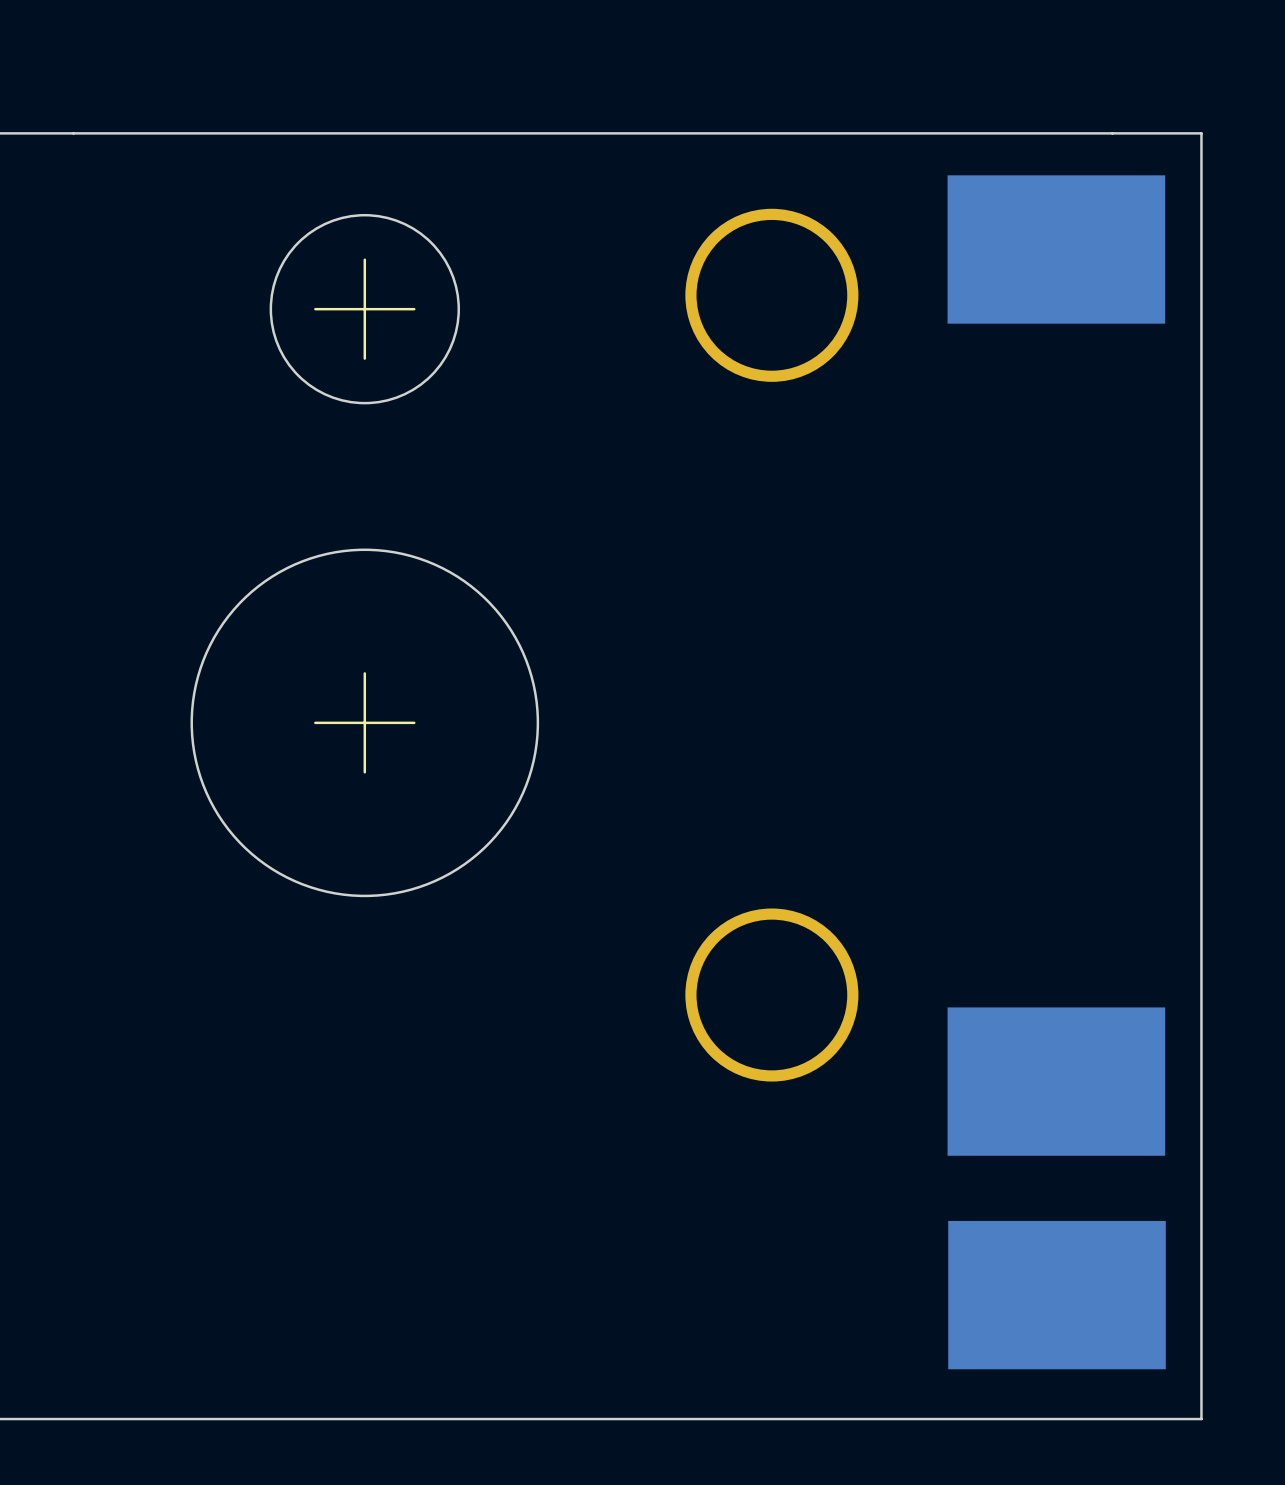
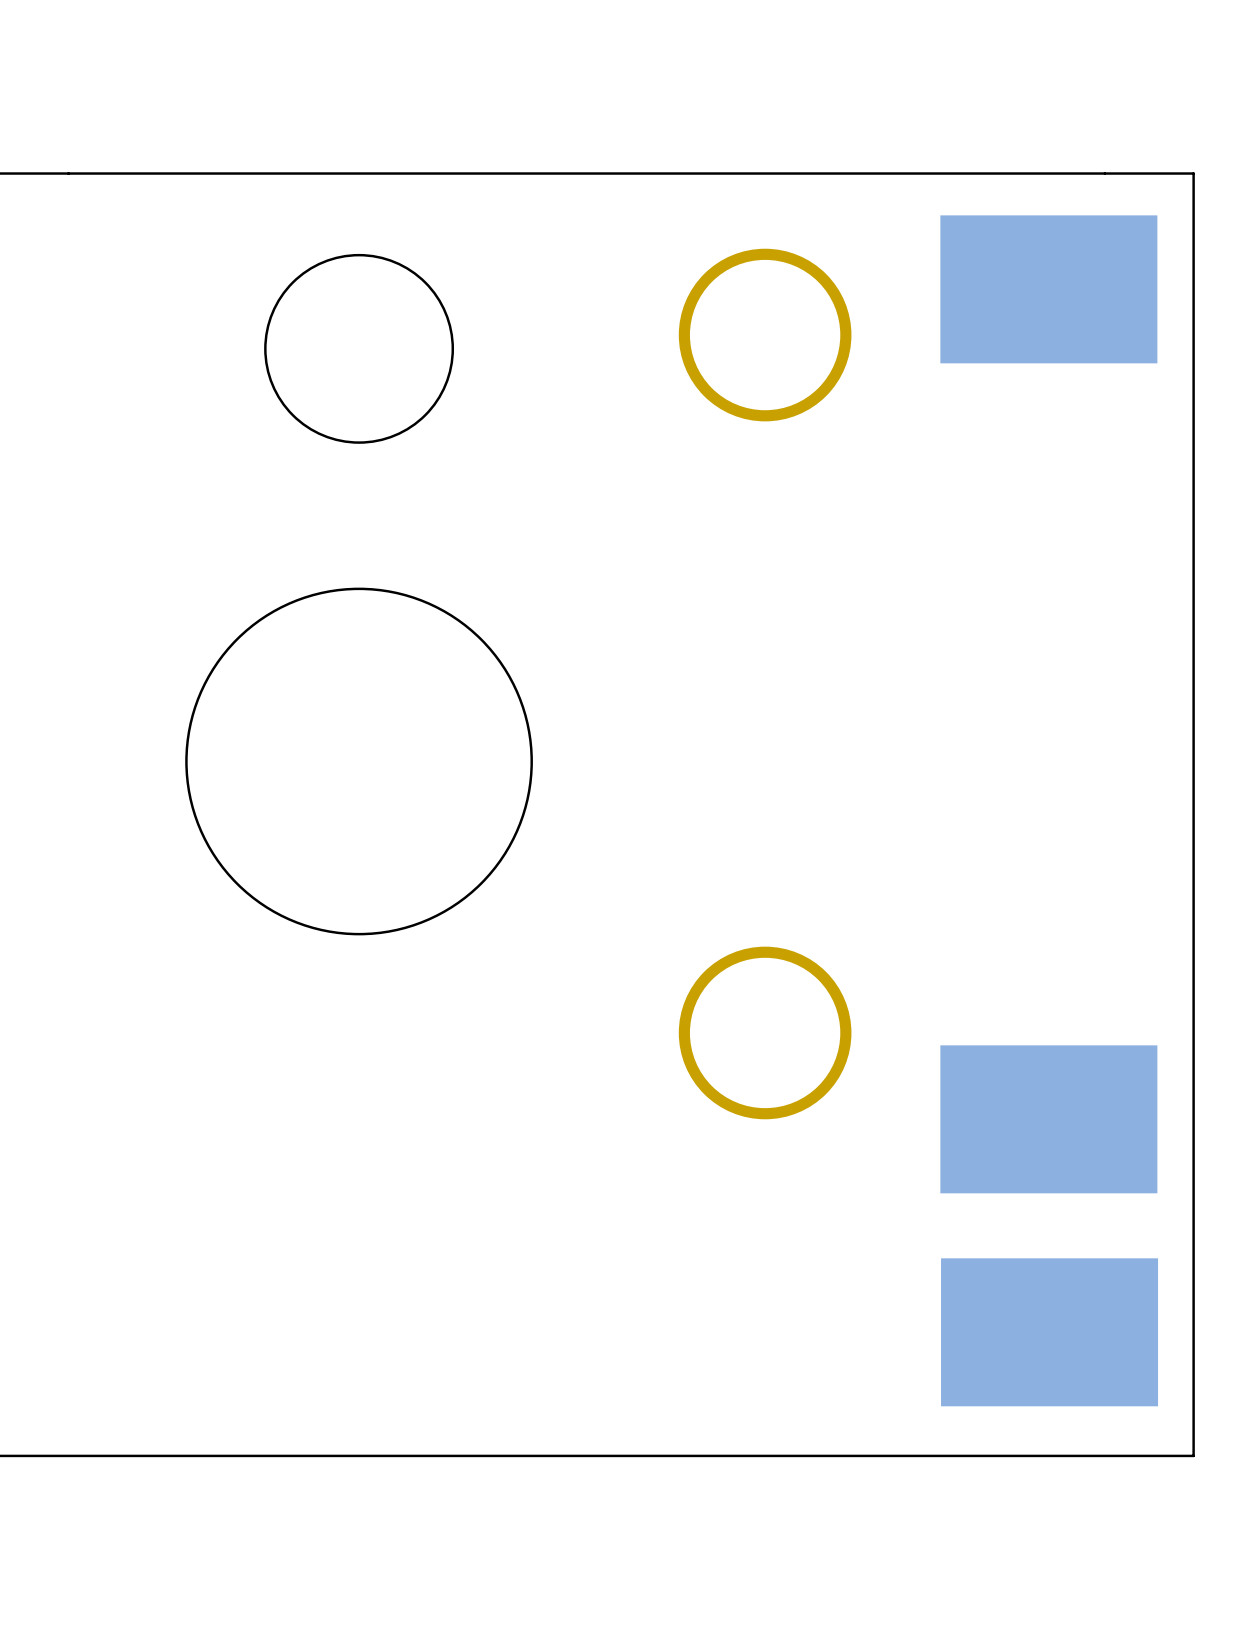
line: (364, 259) (364, 358) -> none
line: (414, 309) (315, 309) -> none
line: (364, 673) (364, 772) -> none
line: (414, 722) (315, 722) -> none

